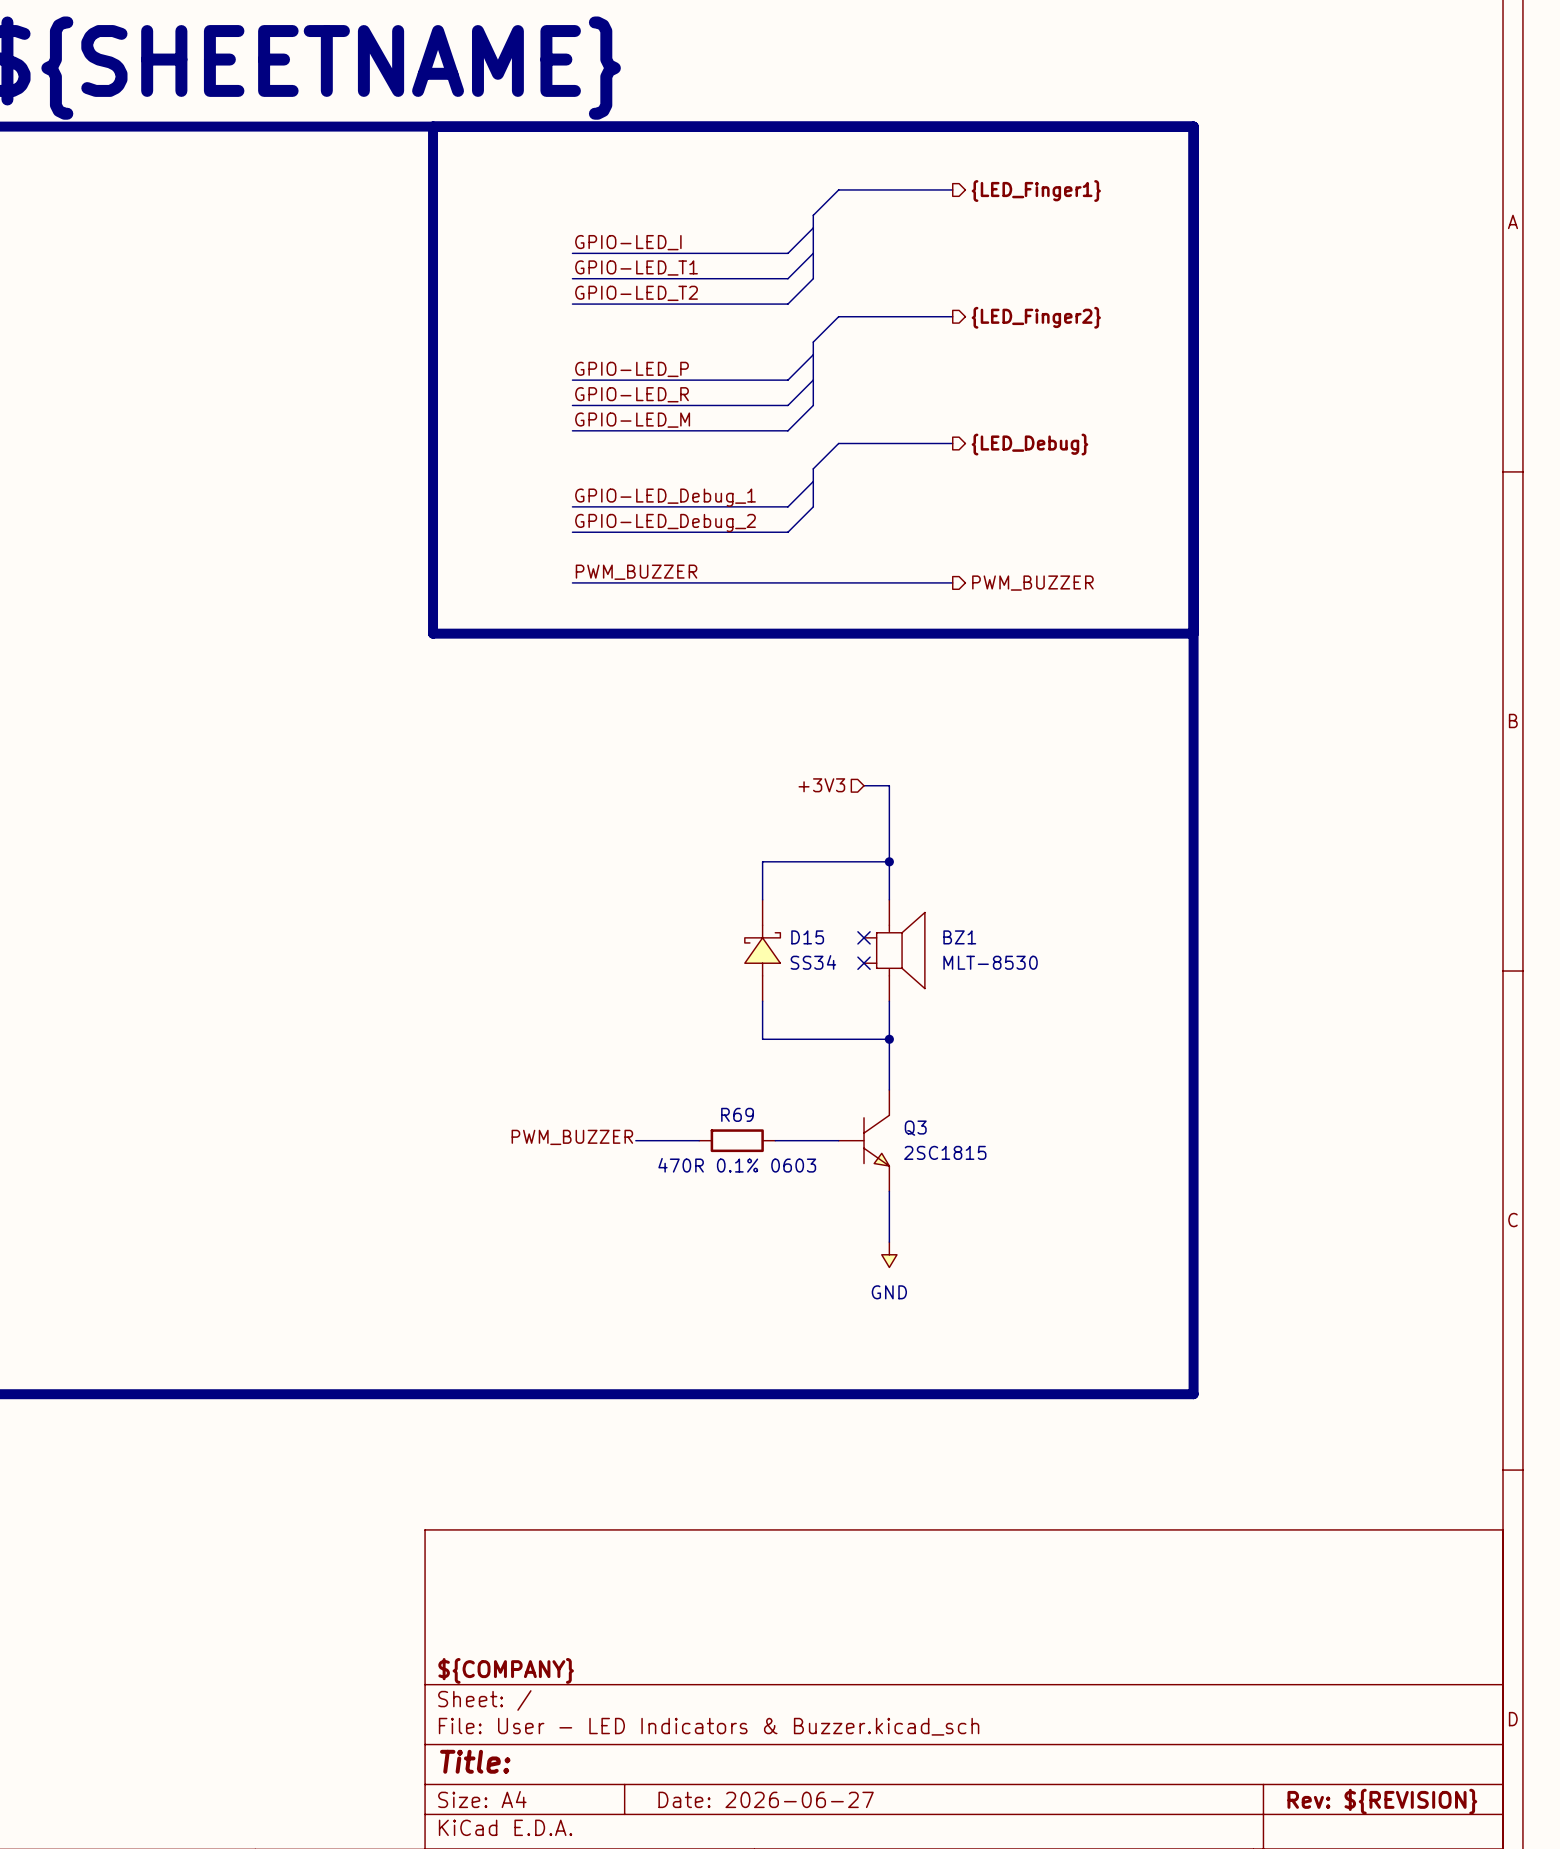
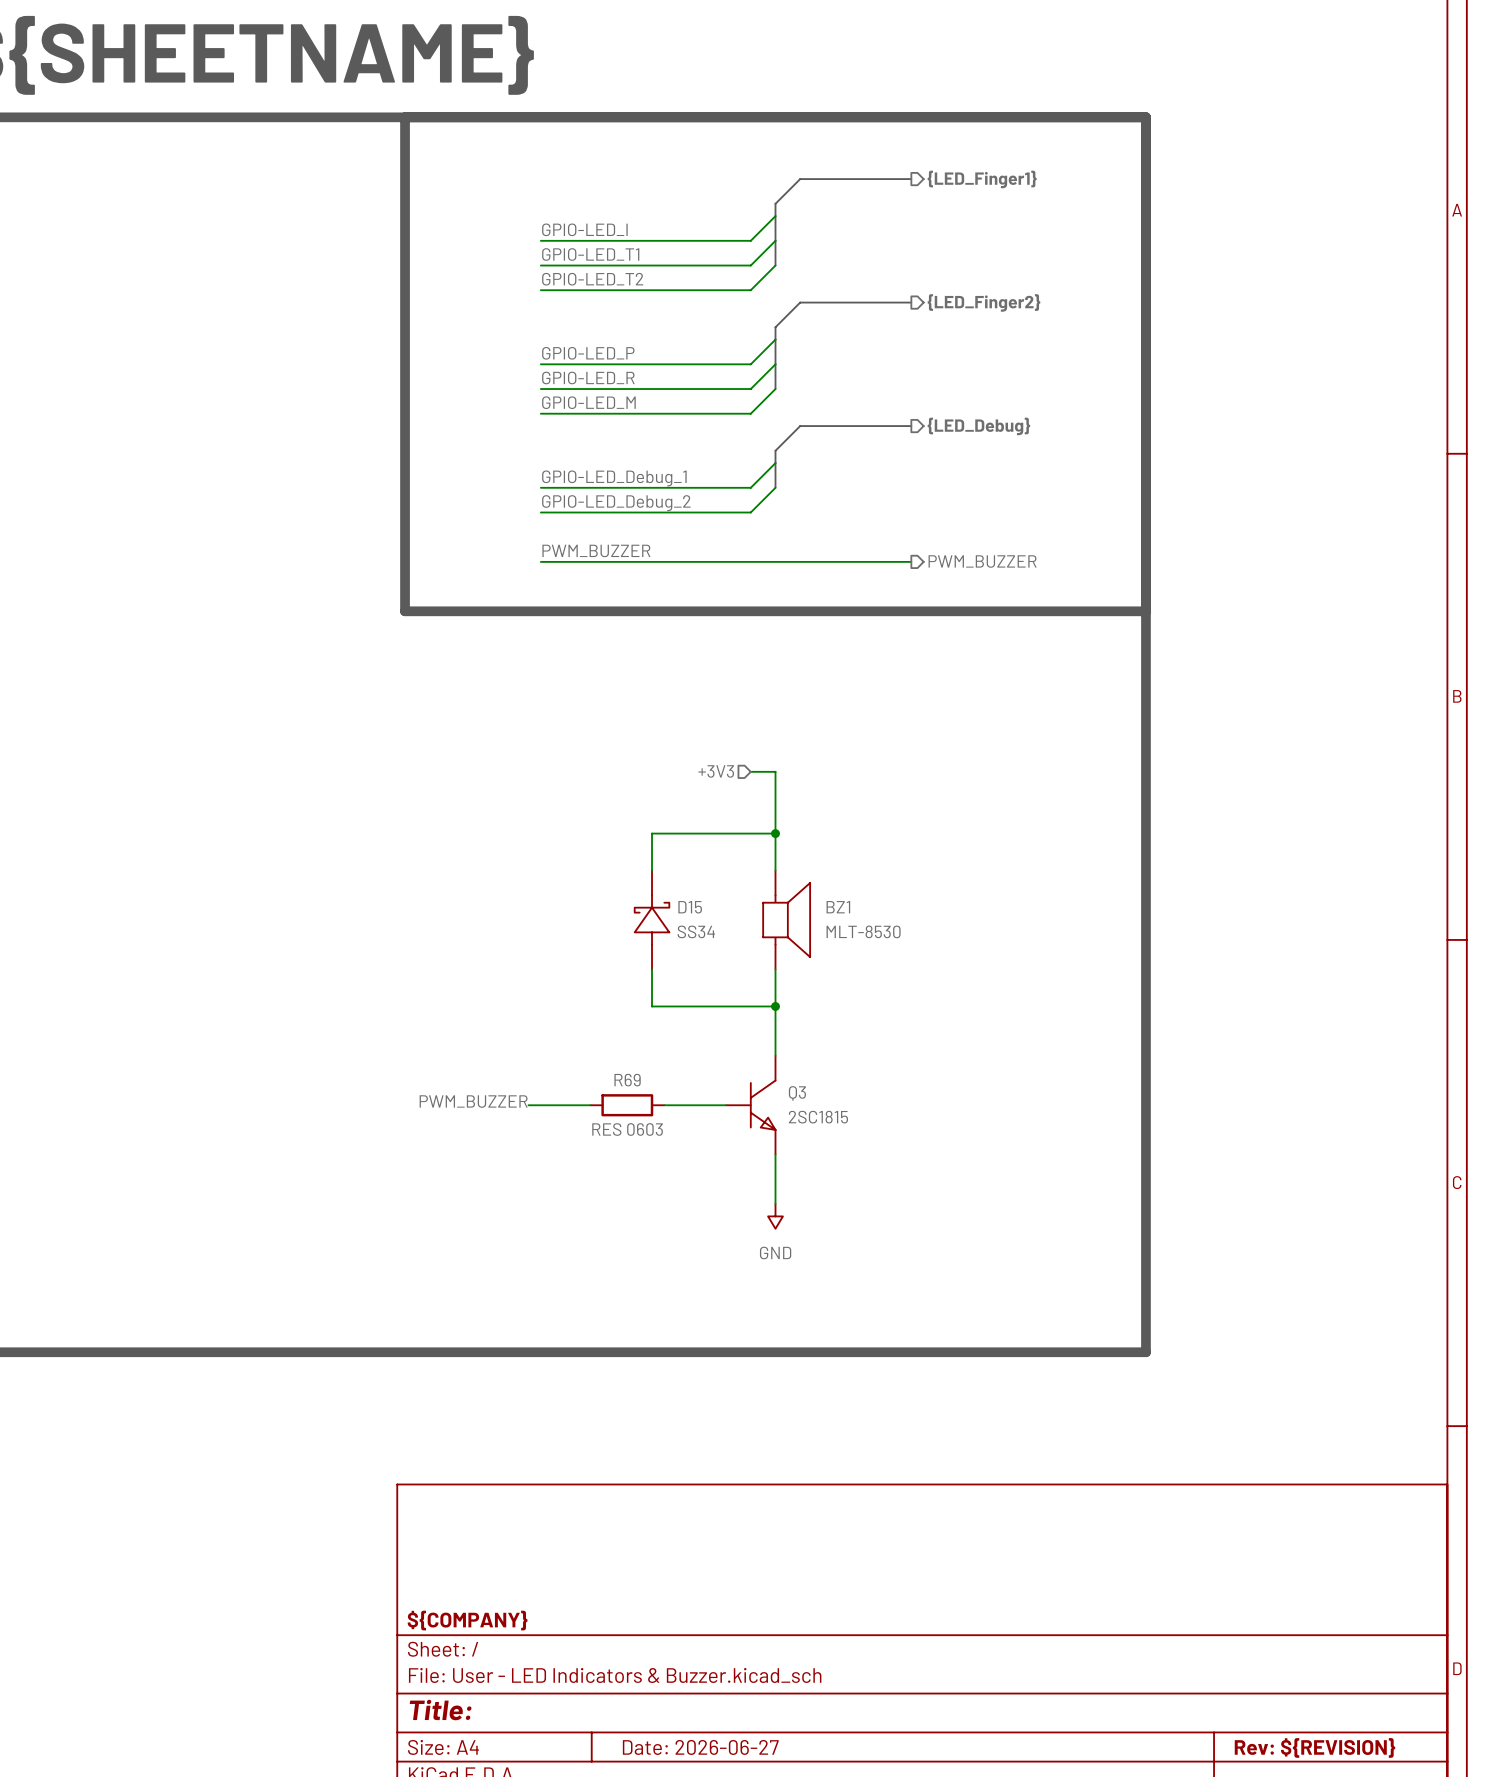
hierarchical label position: +3V3 (821, 785) -> +3V3 (716, 771)
wire: (864, 785) (889, 785) (889, 899) -> none
wire: none -> (750, 771) (775, 771) (775, 870)
wire: (762, 861) (762, 899) -> (726, 833) (652, 833) (652, 870)
wire: (813, 861) (889, 861) -> none
junction: none -> (775, 833)
junction: (889, 861) -> none
BZ1 symbol: [864, 899, 925, 1002] -> [763, 870, 811, 970]
no-connect mark: (864, 937) -> none
D15 position: (762, 950) -> (652, 920)
no-connect mark: (864, 963) -> none
wire: (762, 1001) (762, 1039) -> (652, 969) (652, 1006) (726, 1006)
wire: (889, 1001) (889, 1089) -> (775, 969) (775, 1055)
wire: (813, 1039) (889, 1039) -> none
junction: none -> (775, 1006)
junction: (889, 1039) -> none
label position: PWM_BUZZER (572, 1137) -> PWM_BUZZER (473, 1101)
wire: (635, 1140) (699, 1140) -> (726, 1105) (664, 1105)
R69 position: (737, 1140) -> (627, 1105)
wire: (775, 1140) (838, 1140) -> (528, 1105) (590, 1105)
Q3 position: (864, 1140) -> (750, 1105)
R69 value: 470R 0.1% 0603 (737, 1165) -> RES 0603 (627, 1129)
wire: (889, 1191) (889, 1242) -> (775, 1154) (775, 1204)
power symbol position: GND (889, 1254) -> GND (775, 1216)

